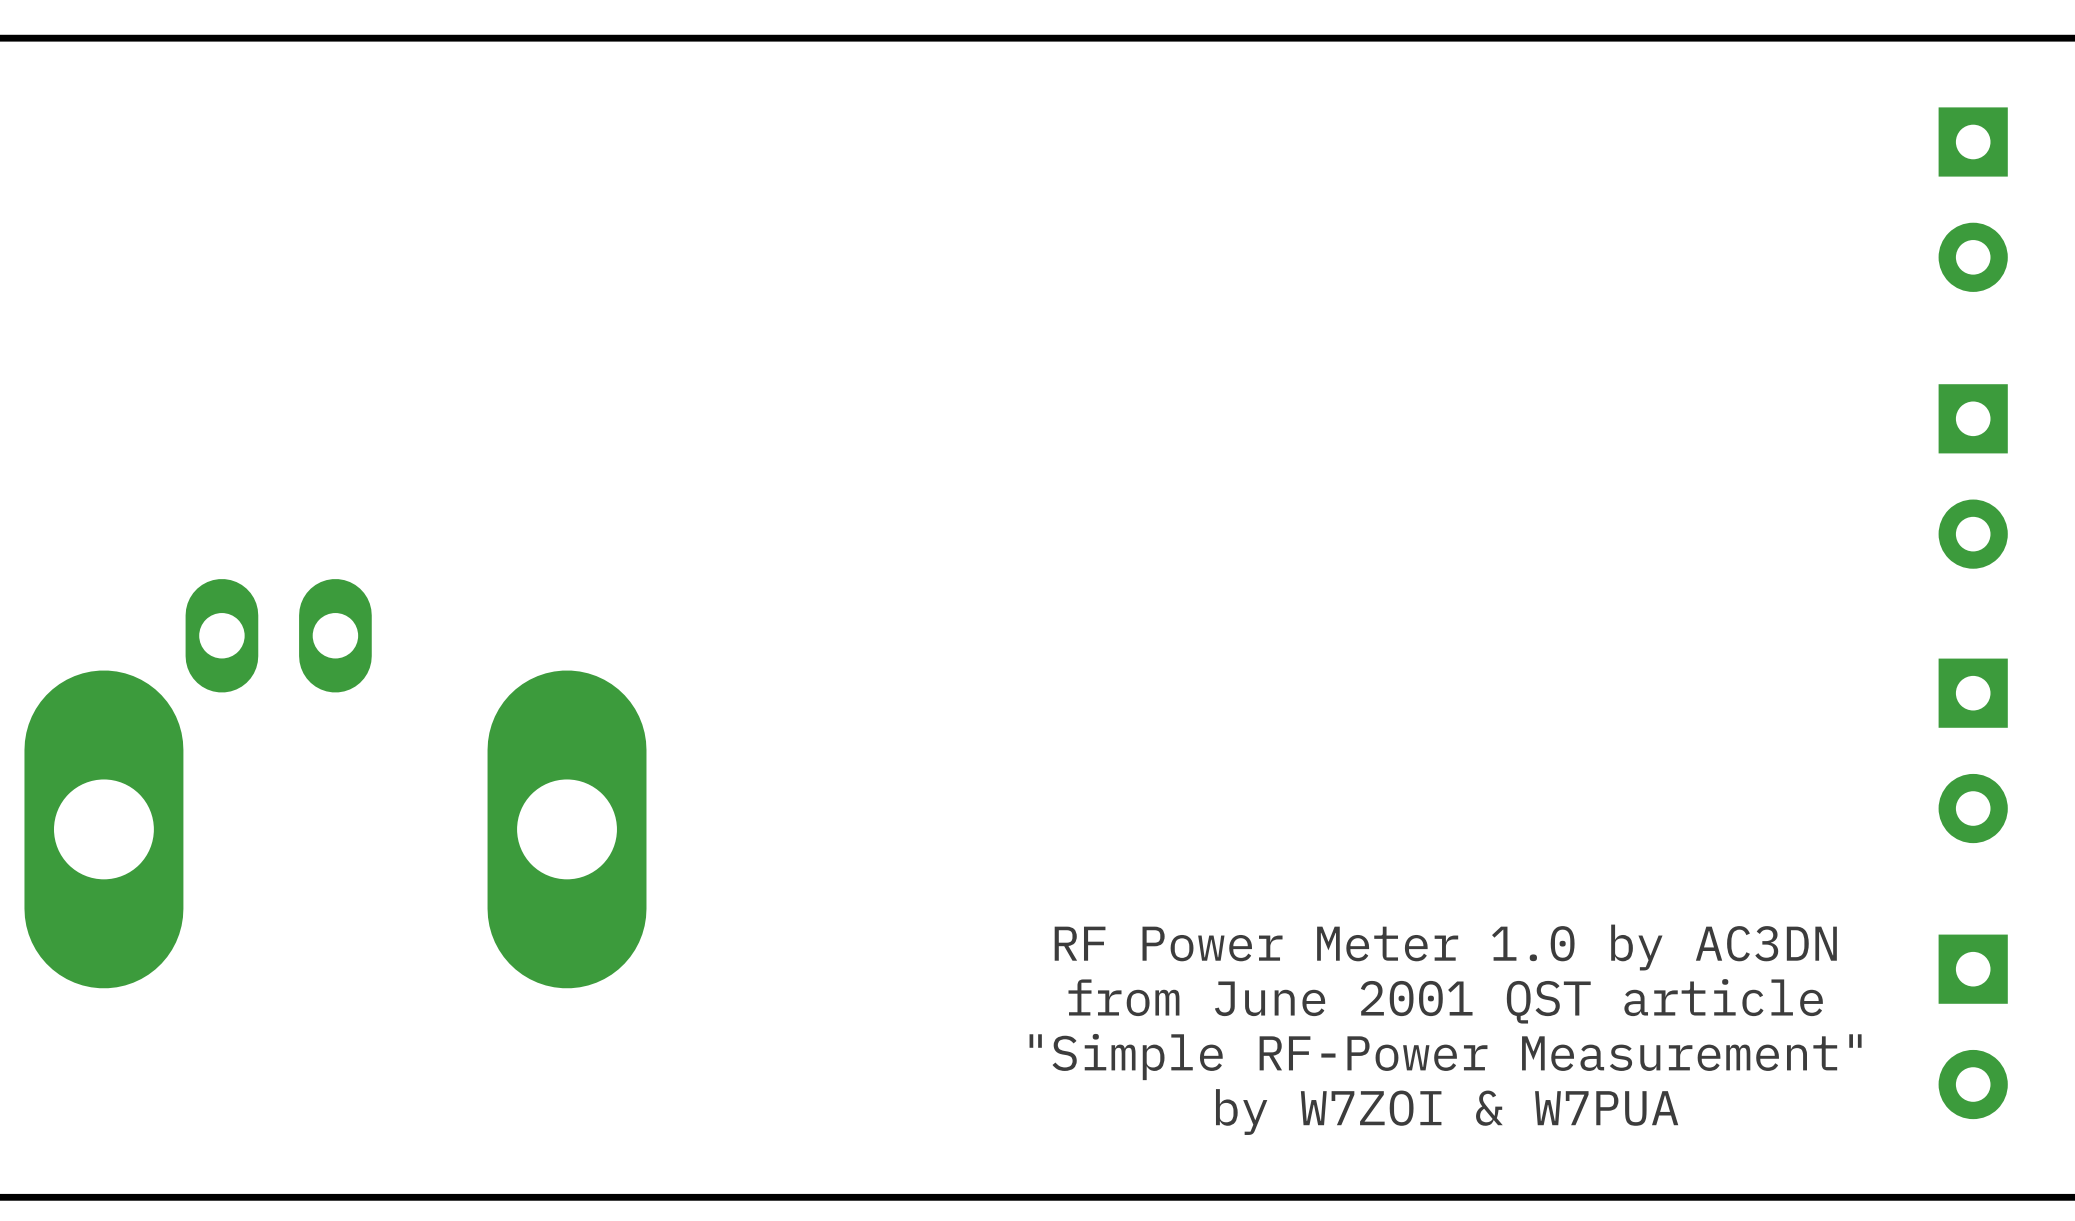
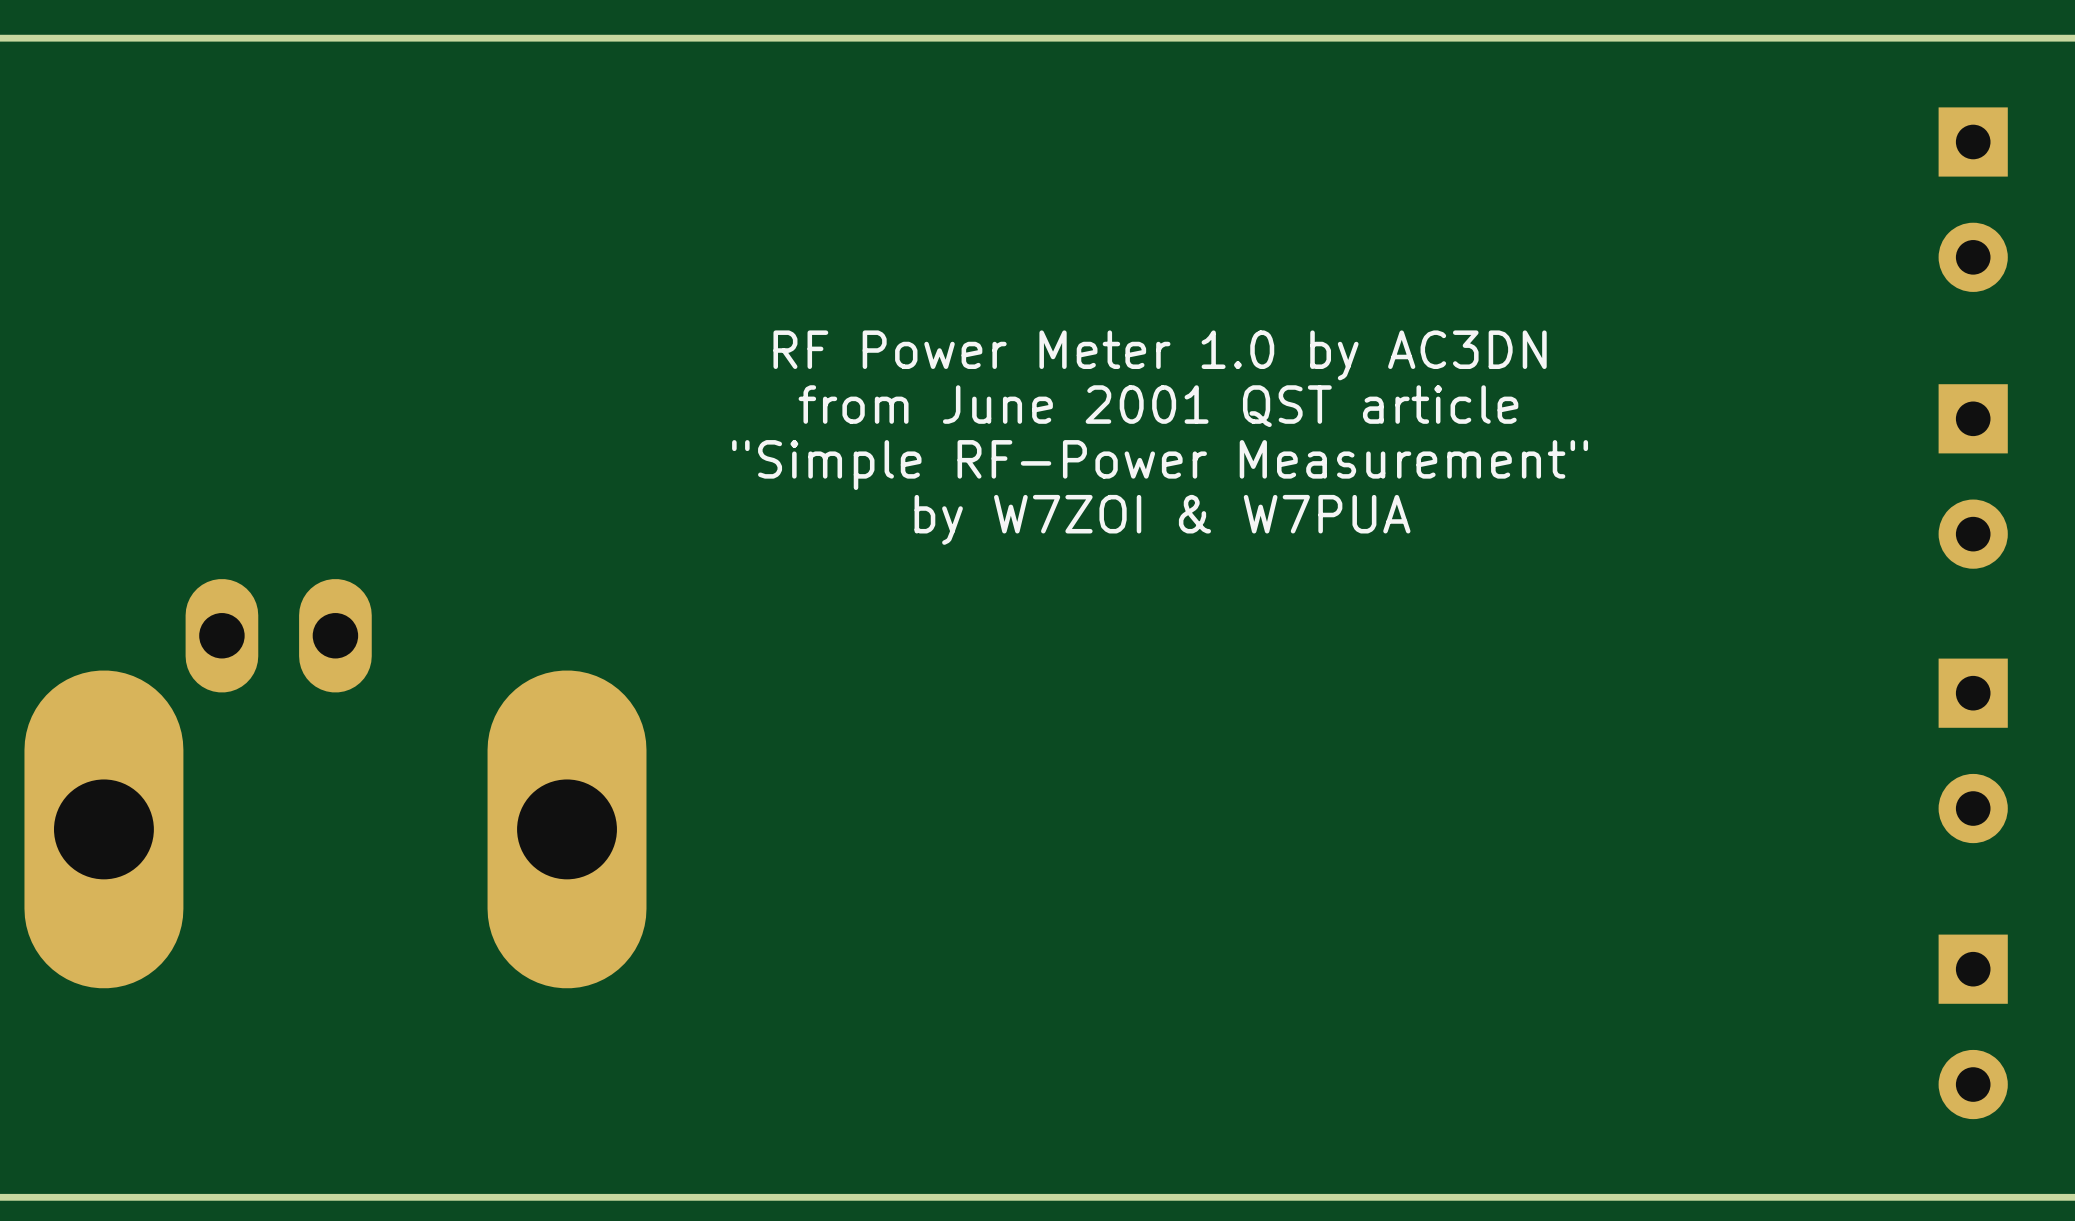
text position: RF Power Meter 1.0 by AC3DN (1445, 947) -> RF Power Meter 1.0 by AC3DN (1160, 355)
text position: from June 2001 QST article (1445, 1001) -> from June 2001 QST article (1158, 406)
text position: "Simple RF-Power Measurement" (1445, 1057) -> "Simple RF-Power Measurement" (1160, 465)
text position: by W7ZOI & W7PUA (1447, 1112) -> by W7ZOI & W7PUA (1162, 519)

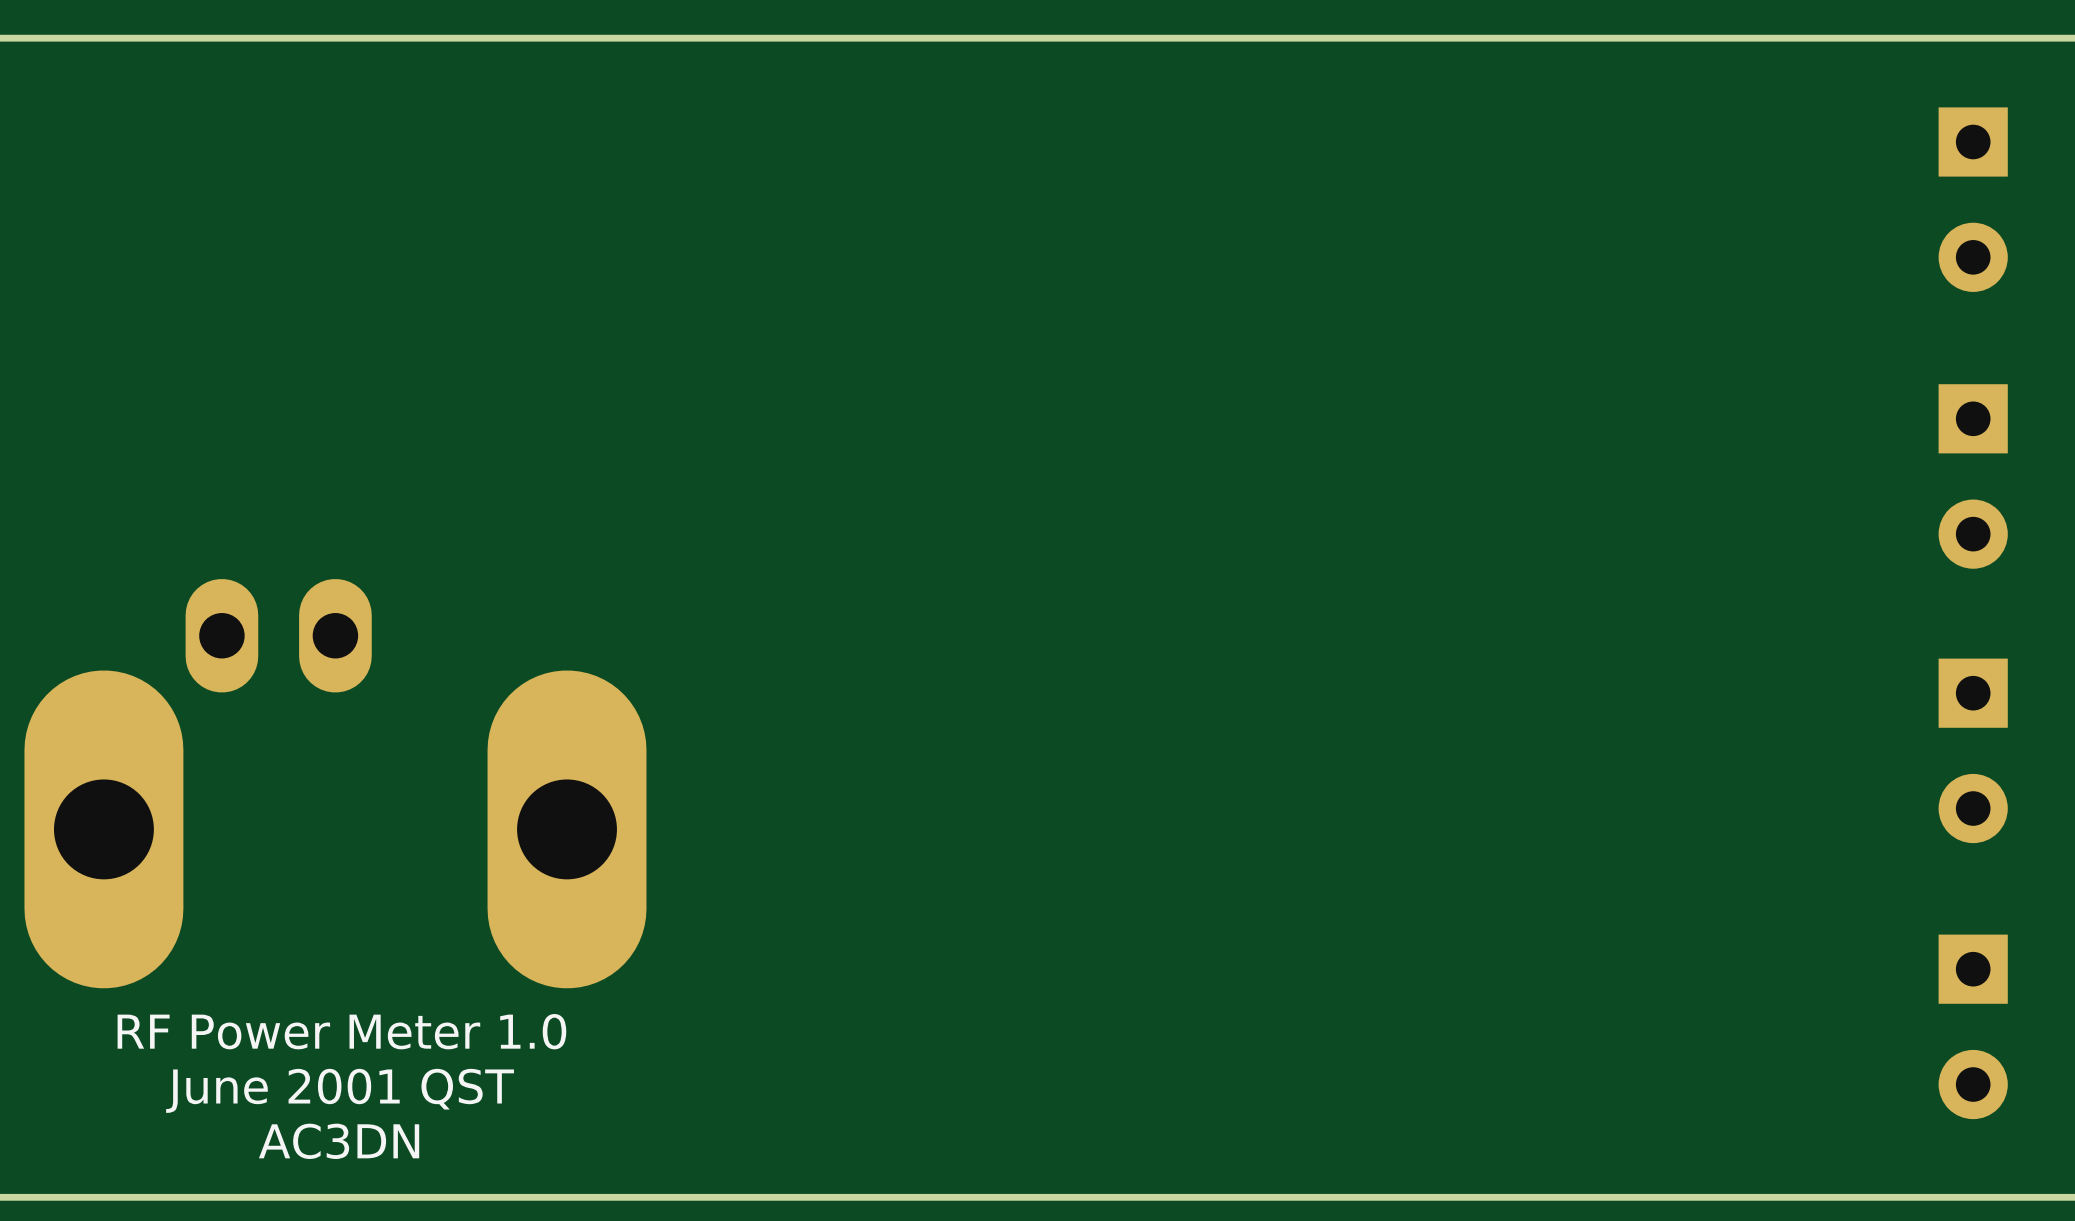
text: RF Power Meter 1.0 by AC3DN (1160, 355) -> none
text: from June 2001 QST article (1158, 406) -> none
text: "Simple RF-Power Measurement" (1160, 465) -> none
text: by W7ZOI & W7PUA (1162, 519) -> none
text: none -> RF Power Meter 1.0 (341, 1031)
text: none -> June 2001 QST (340, 1090)
text: none -> AC3DN (339, 1141)

